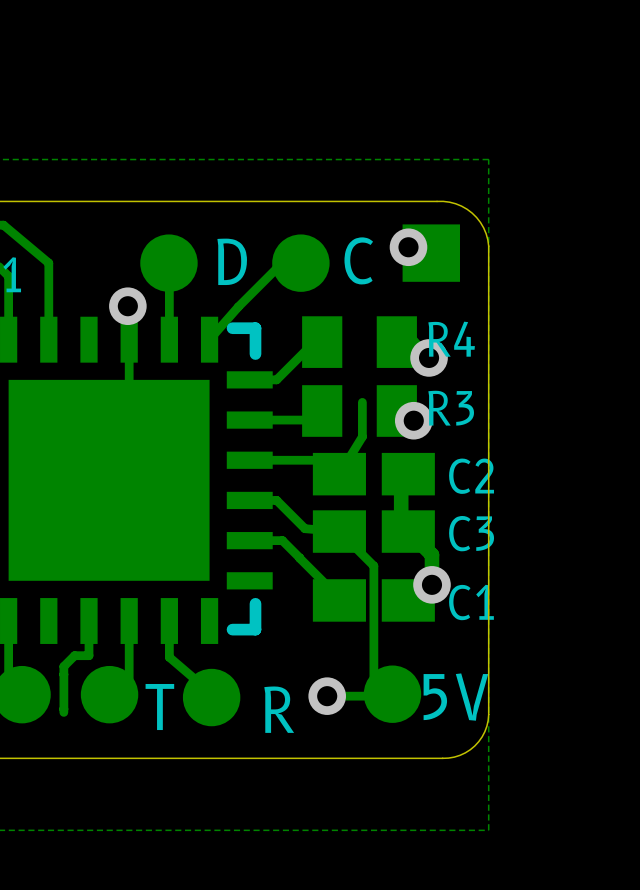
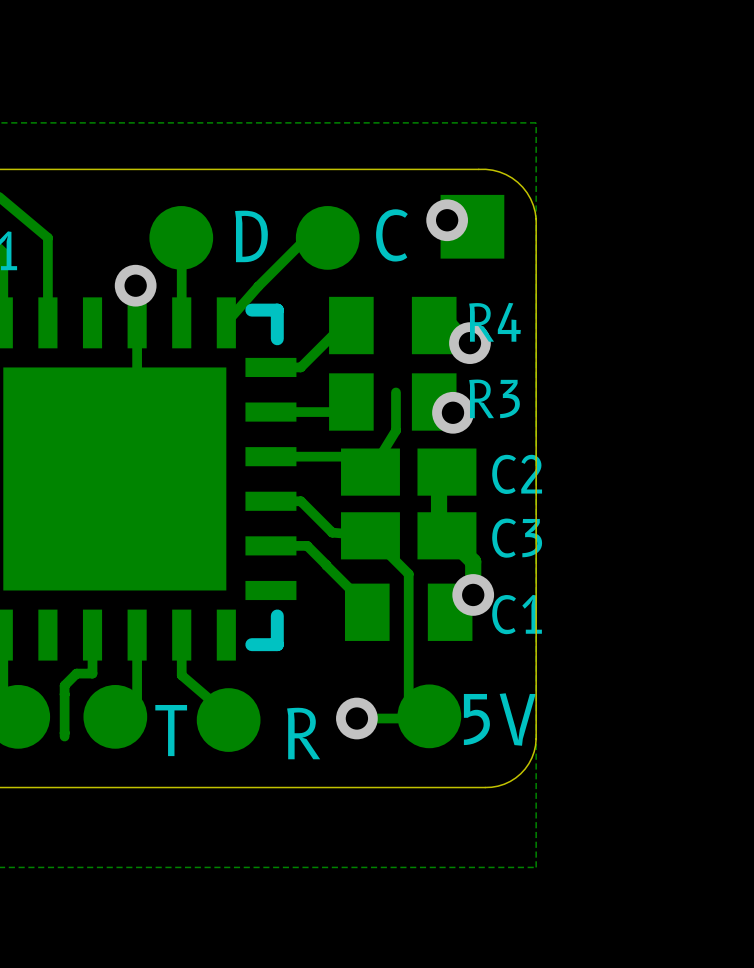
C1 footprint: [312, 579, 435, 622] -> [344, 583, 473, 641]

